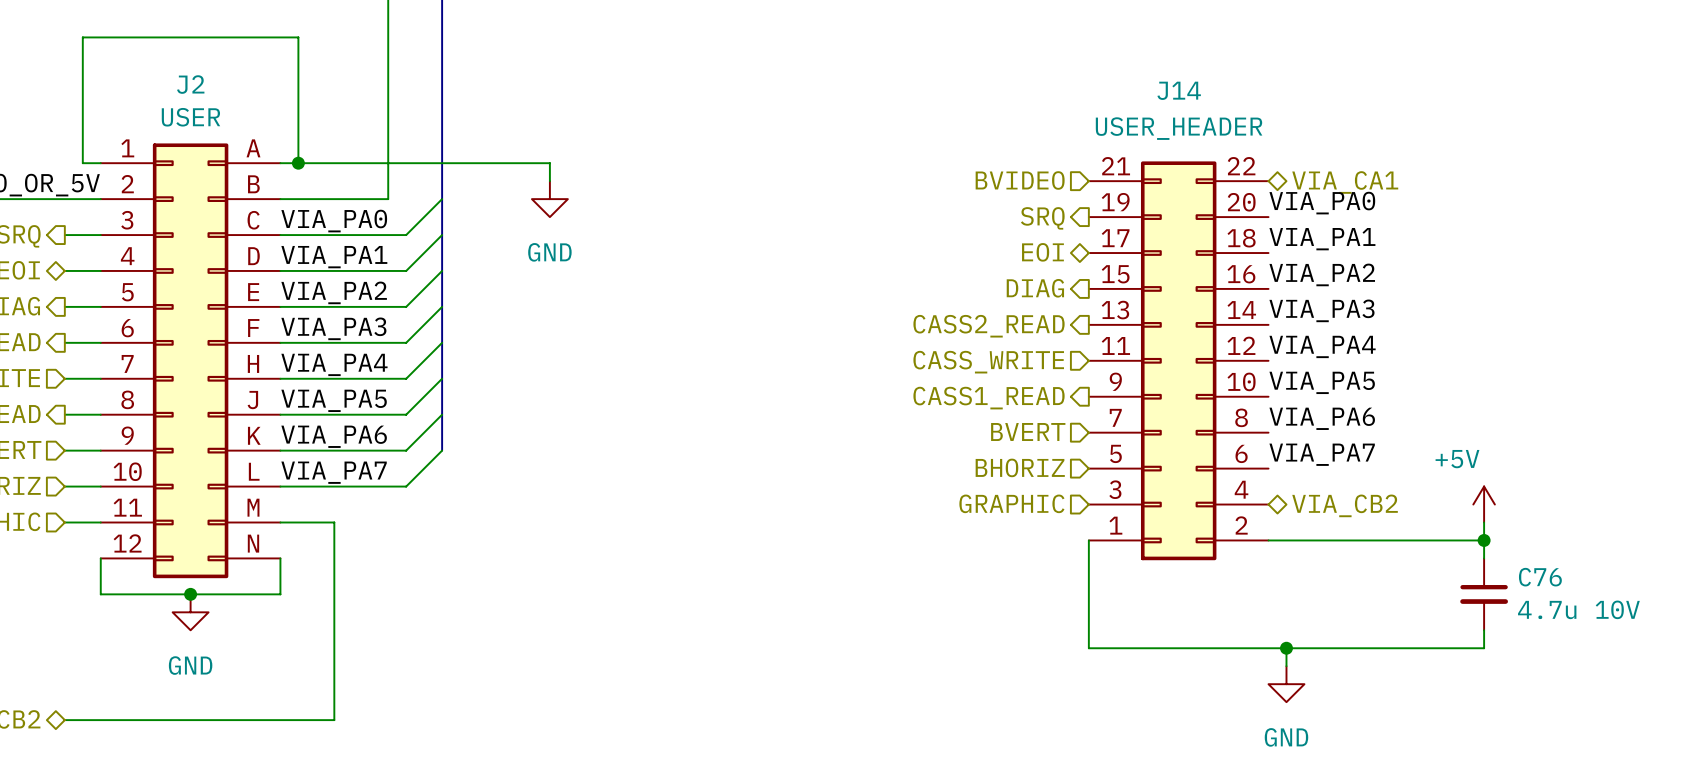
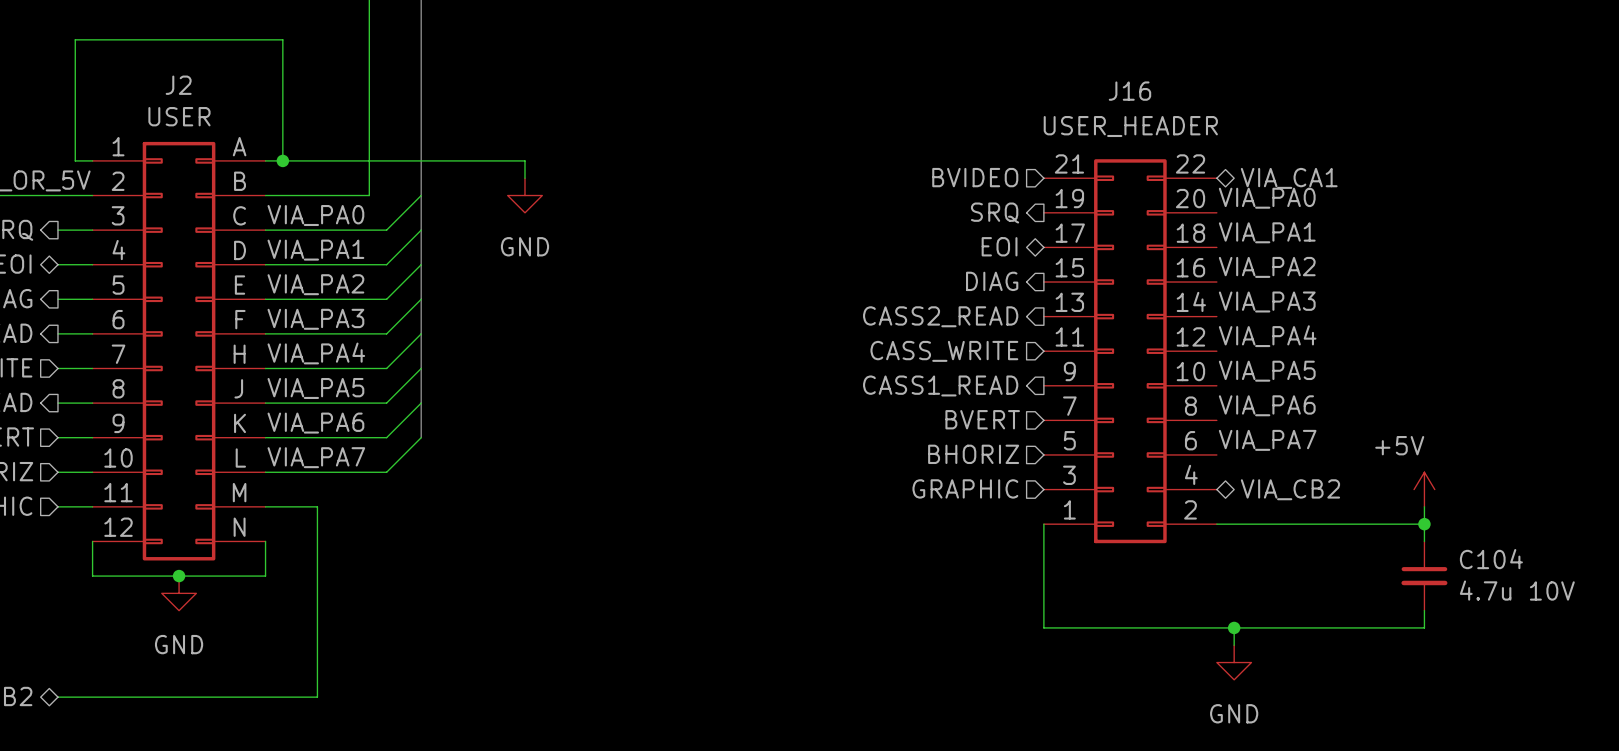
J14 name: J14 (1179, 90) -> J16 (1129, 91)
C76 name: C76 (1540, 577) -> C104 (1491, 559)

